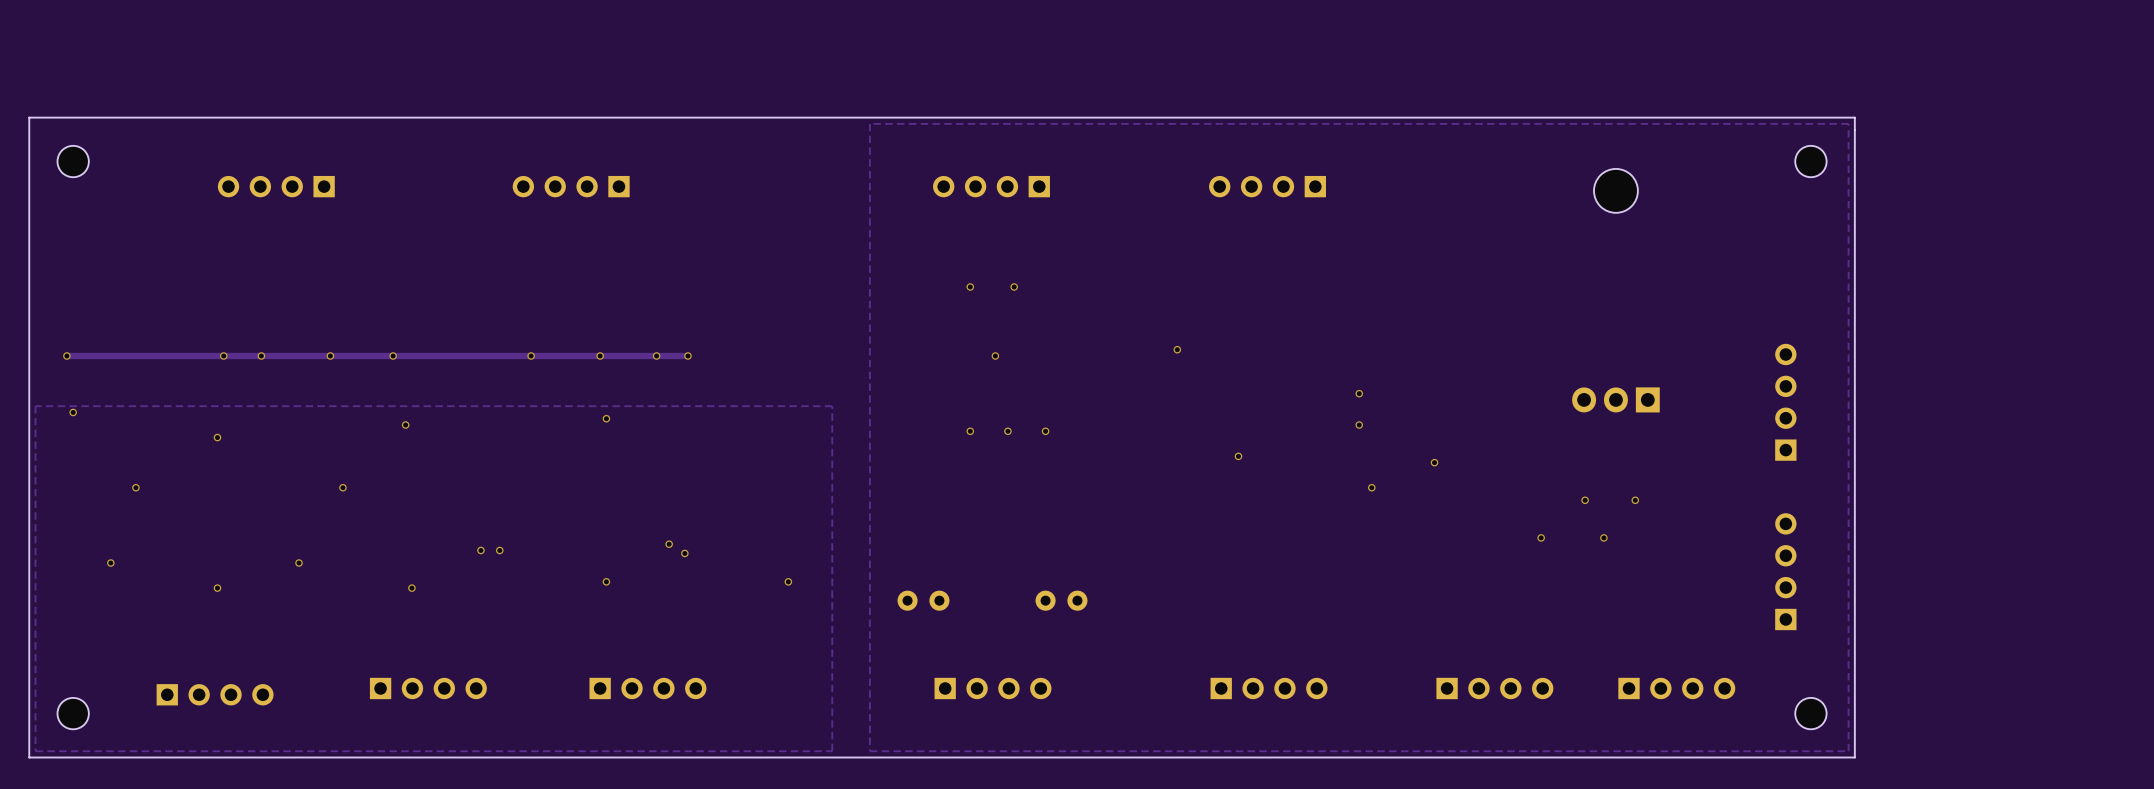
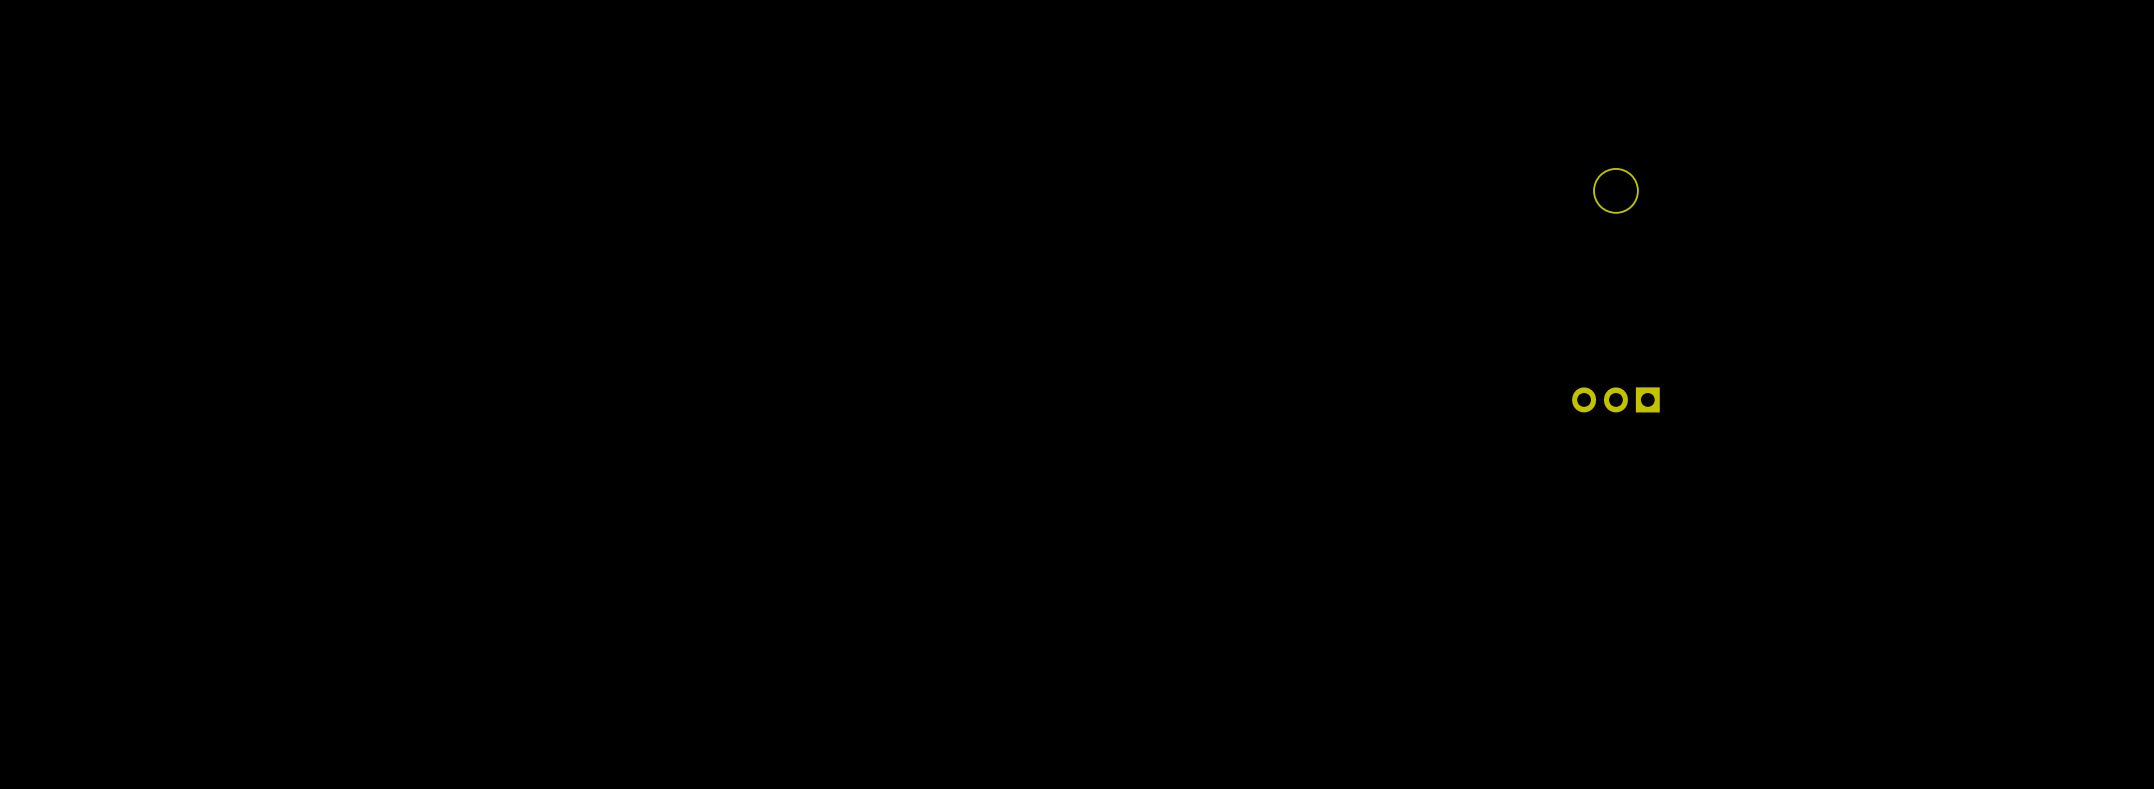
board edge: (1854, 117) (1854, 757) (29, 757) (29, 117) (1854, 117) -> none
zone outline: (1848, 123) (1848, 751) (869, 751) (869, 123) (1848, 123) -> none
part: (73, 161) -> none
part: (1810, 161) -> none
part: (276, 186) -> none
part: (571, 186) -> none
part: (991, 186) -> none
part: (1267, 186) -> none
via: (970, 286) -> none
via: (1014, 286) -> none
via: (1177, 349) -> none
via: (66, 356) -> none
via: (223, 356) -> none
via: (261, 356) -> none
via: (330, 356) -> none
via: (393, 356) -> none
via: (531, 356) -> none
via: (600, 356) -> none
via: (656, 356) -> none
track: (687, 356) (66, 356) -> none
via: (687, 356) -> none
via: (995, 356) -> none
via: (1359, 393) -> none
part: (1785, 402) -> none
zone outline: (832, 406) (832, 751) (35, 751) (35, 406) (832, 406) -> none
via: (73, 412) -> none
via: (606, 418) -> none
via: (405, 425) -> none
via: (1359, 425) -> none
via: (970, 431) -> none
via: (1007, 431) -> none
via: (1045, 431) -> none
via: (217, 437) -> none
via: (1238, 456) -> none
via: (1434, 462) -> none
via: (135, 487) -> none
via: (342, 487) -> none
via: (1371, 487) -> none
via: (1585, 500) -> none
via: (1635, 500) -> none
via: (1541, 537) -> none
via: (1603, 537) -> none
via: (669, 544) -> none
via: (480, 550) -> none
via: (499, 550) -> none
via: (684, 553) -> none
via: (110, 563) -> none
via: (299, 563) -> none
part: (1785, 571) -> none
via: (606, 581) -> none
via: (788, 581) -> none
via: (217, 588) -> none
via: (411, 588) -> none
part: (923, 600) -> none
part: (1061, 600) -> none
part: (428, 688) -> none
part: (647, 688) -> none
part: (993, 688) -> none
part: (1269, 688) -> none
part: (1494, 688) -> none
part: (1676, 688) -> none
part: (215, 694) -> none
part: (73, 713) -> none
part: (1810, 713) -> none

